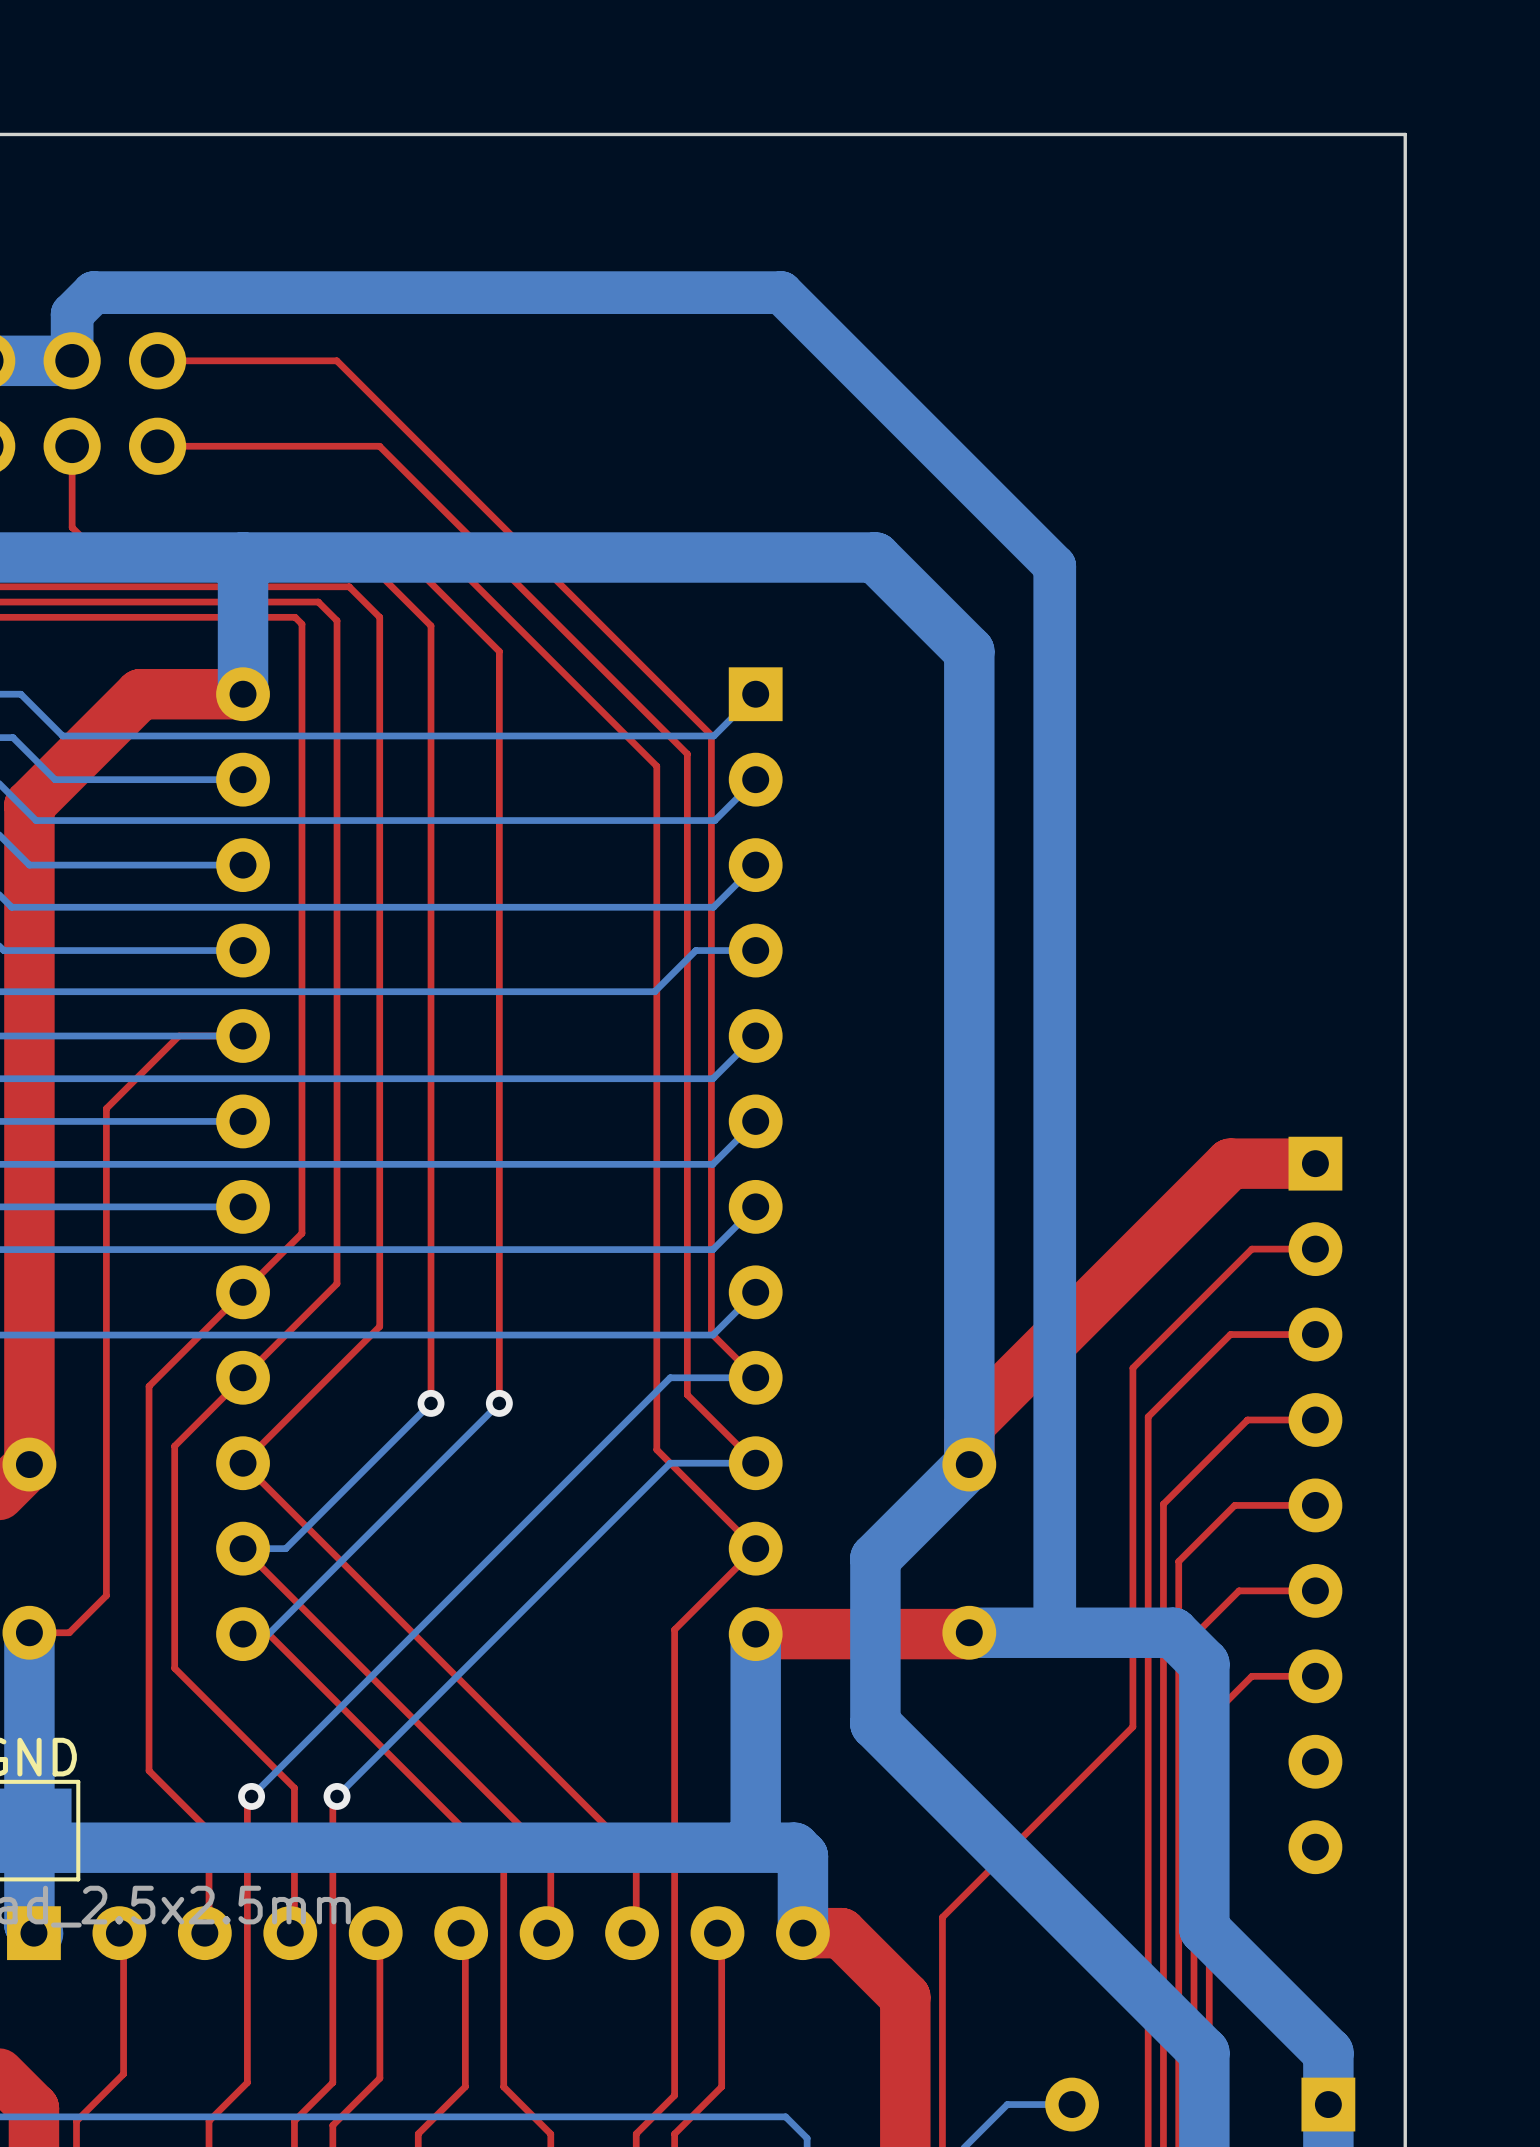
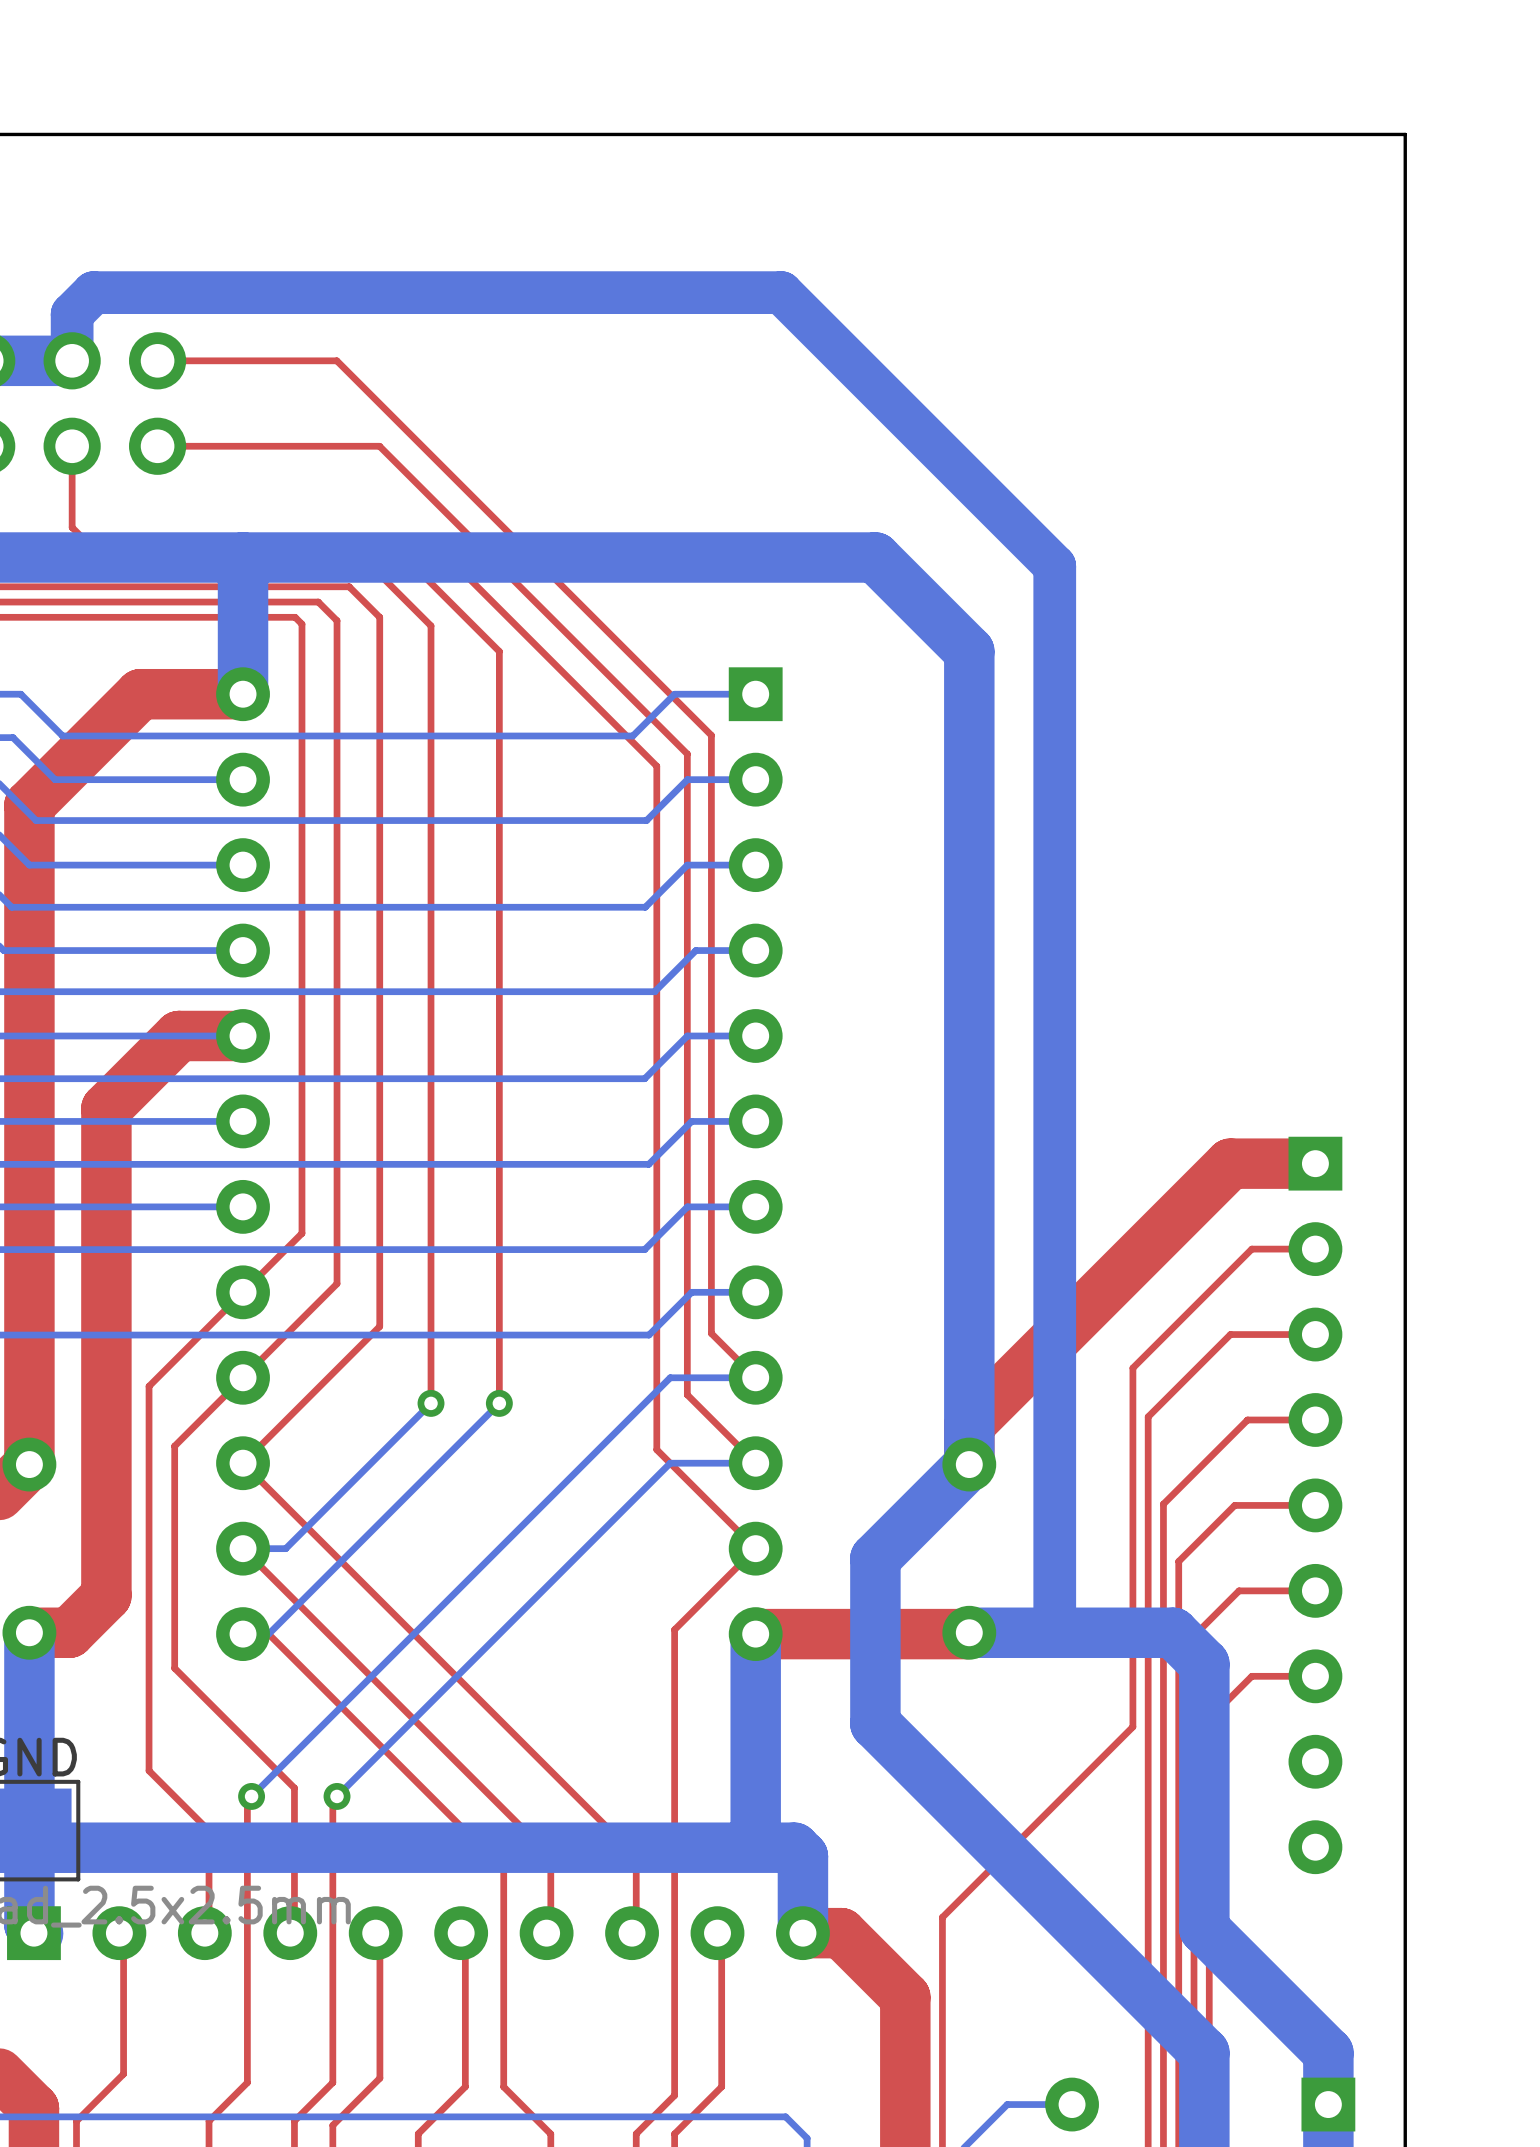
bottom track: (755, 694) (713, 735) (632, 735) -> (755, 694) (674, 694) (632, 735)
bottom track: (755, 779) (714, 820) (646, 820) -> (755, 779) (687, 779) (646, 820)
bottom track: (755, 865) (713, 907) (645, 907) -> (755, 865) (687, 865) (645, 907)
top track width: thin (243, 1035) (179, 1035) (106, 1108) (106, 1595) (69, 1632) (29, 1632) -> thick (243, 1035) (179, 1035) (106, 1108) (106, 1595) (69, 1632) (29, 1632)
bottom track: (755, 1035) (712, 1078) (644, 1078) -> (755, 1035) (687, 1035) (644, 1078)
bottom track: (755, 1121) (712, 1164) (648, 1164) -> (755, 1121) (691, 1121) (648, 1164)
bottom track: (755, 1206) (712, 1249) (644, 1249) -> (755, 1206) (687, 1206) (644, 1249)
bottom track: (755, 1292) (712, 1335) (648, 1335) -> (755, 1292) (691, 1292) (648, 1335)

